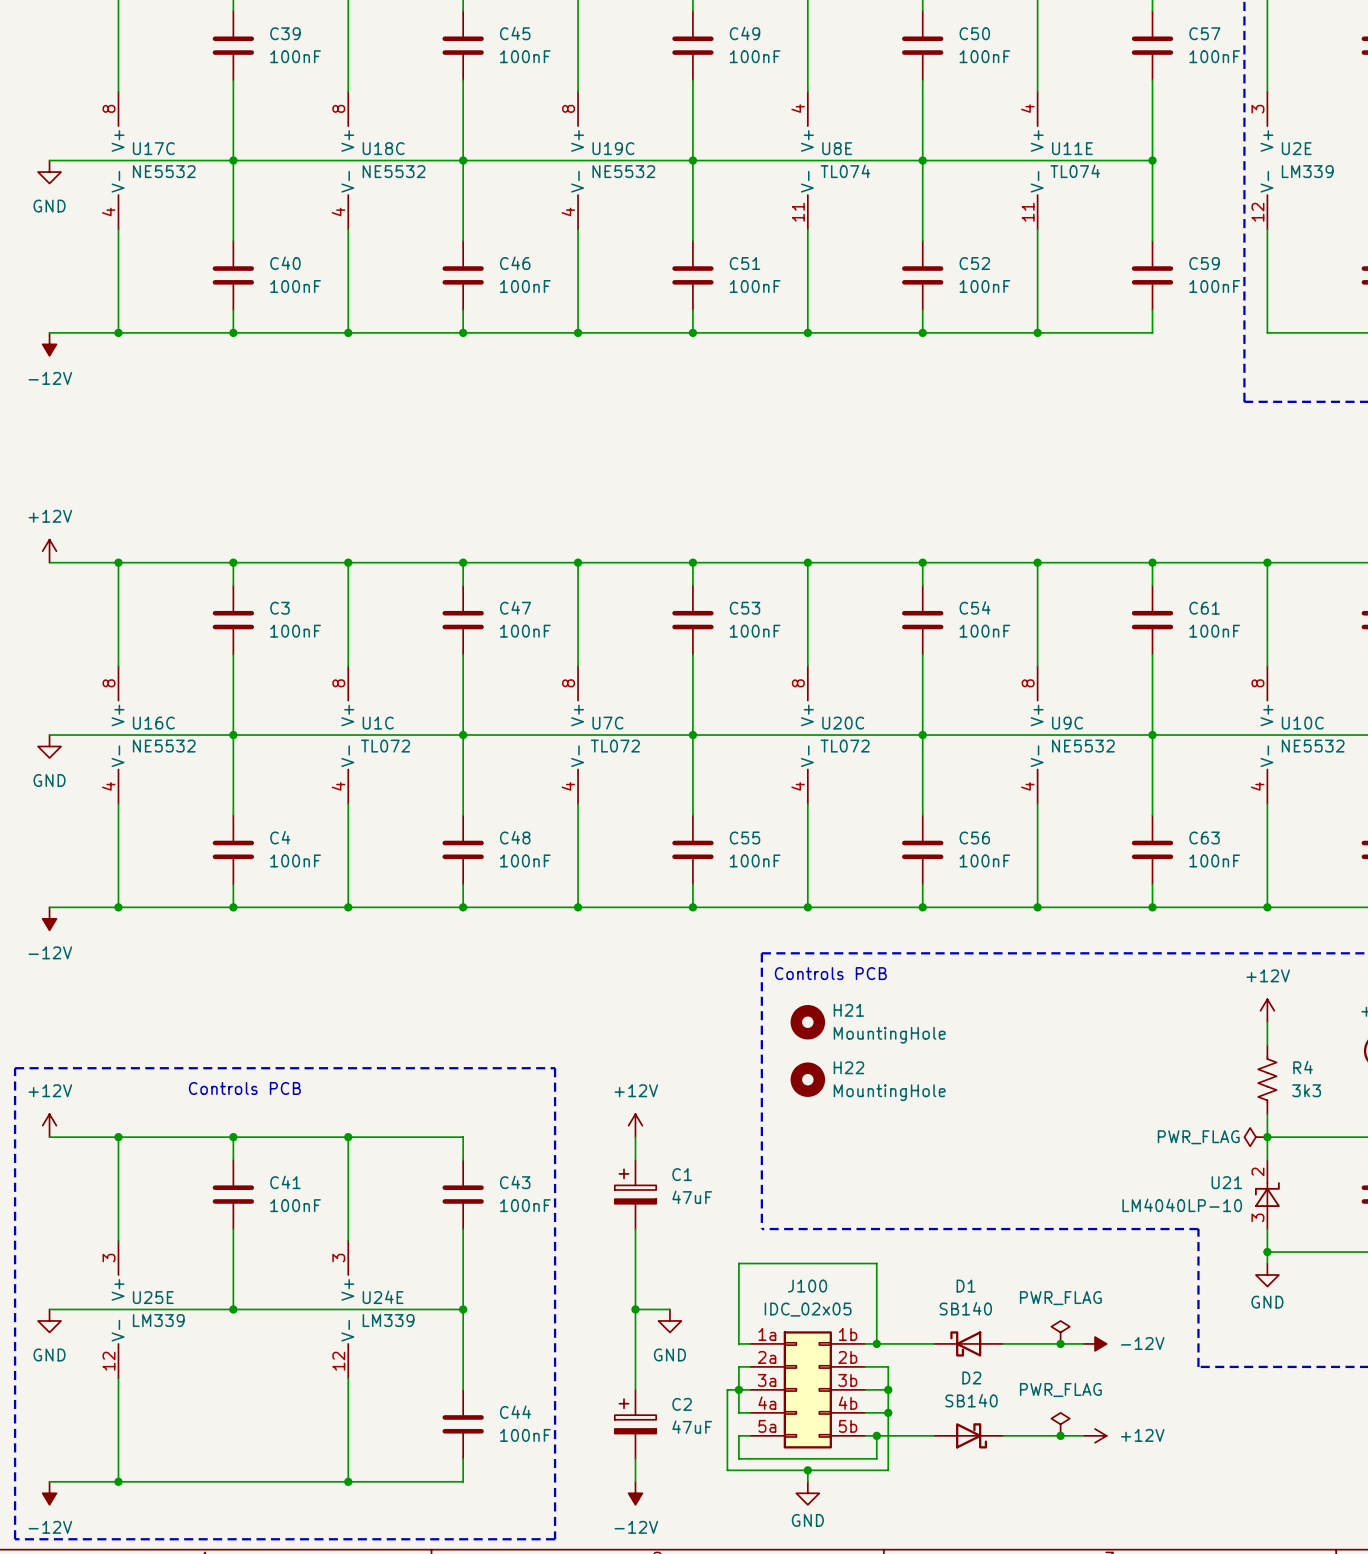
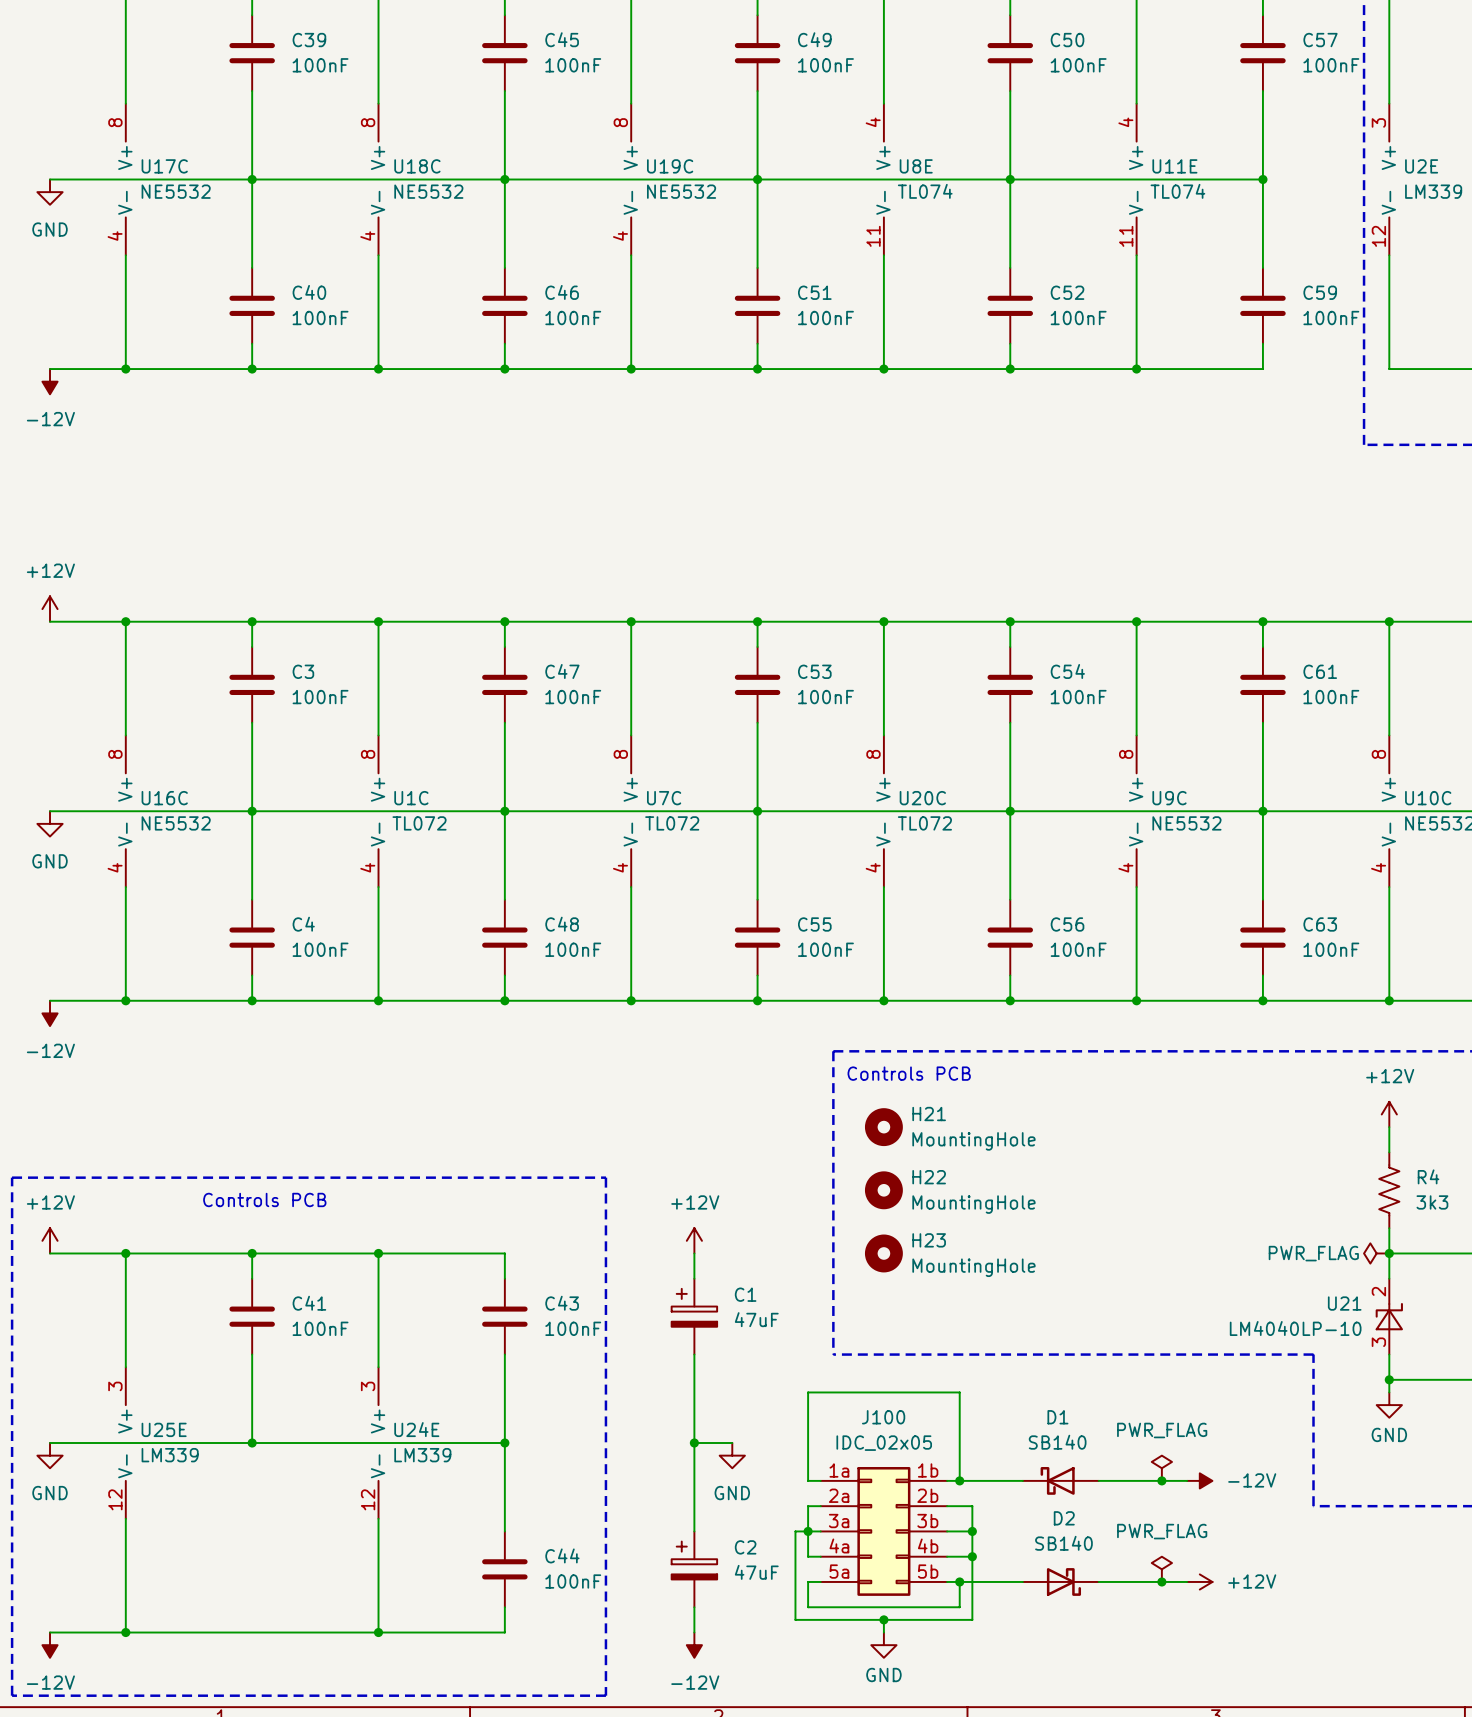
H23: none -> MountingHole (883, 1253)

